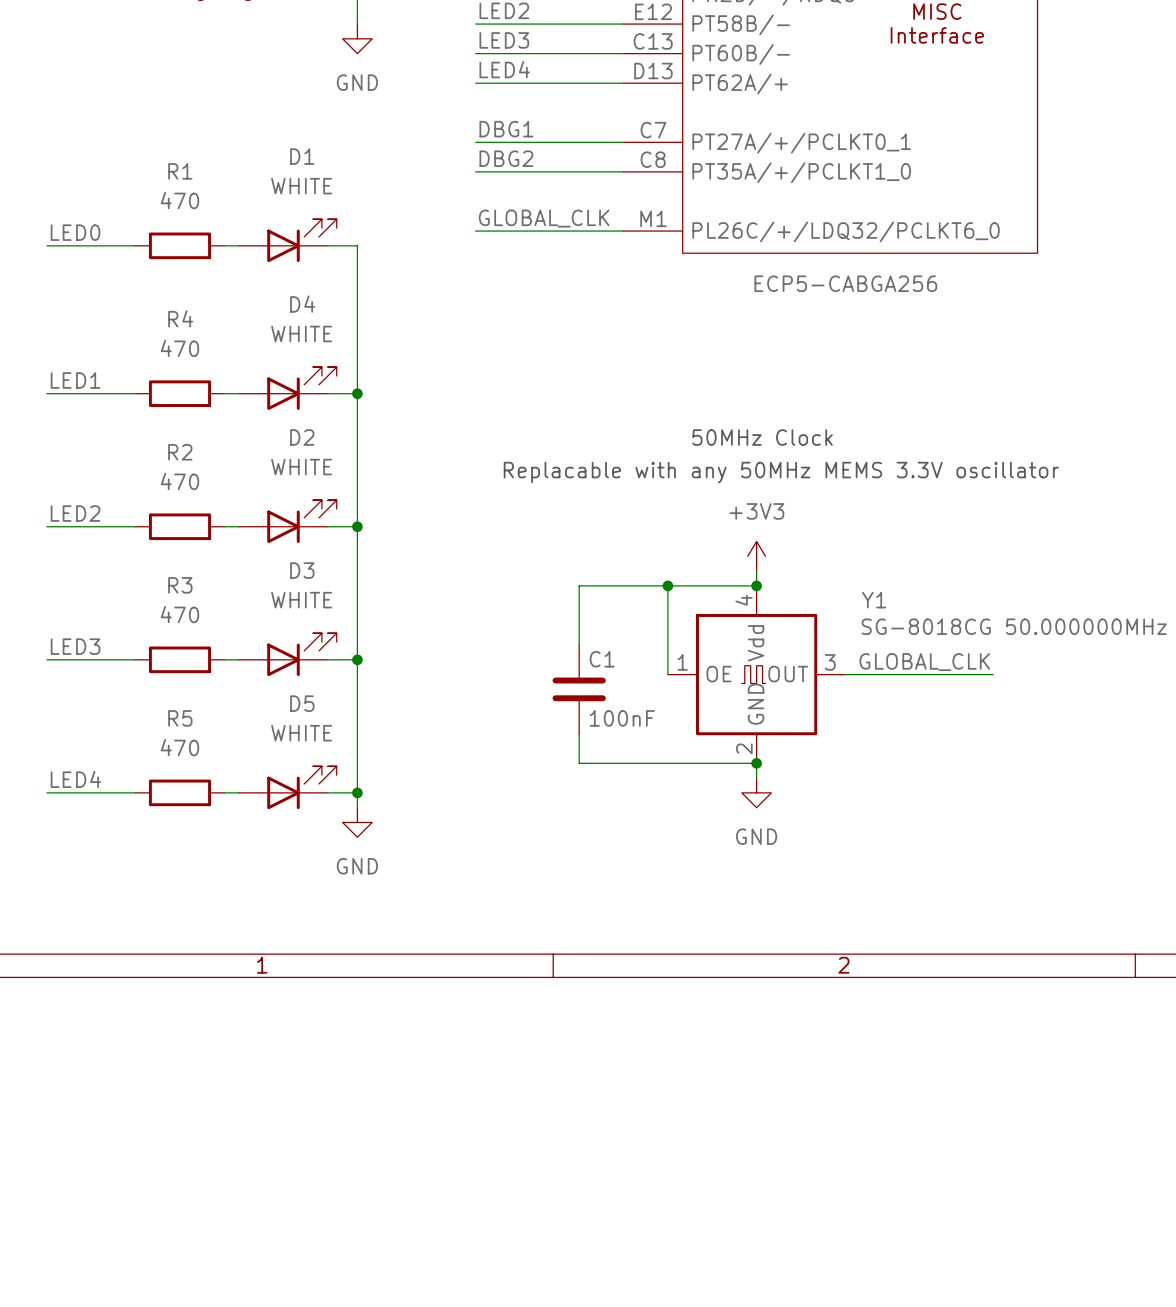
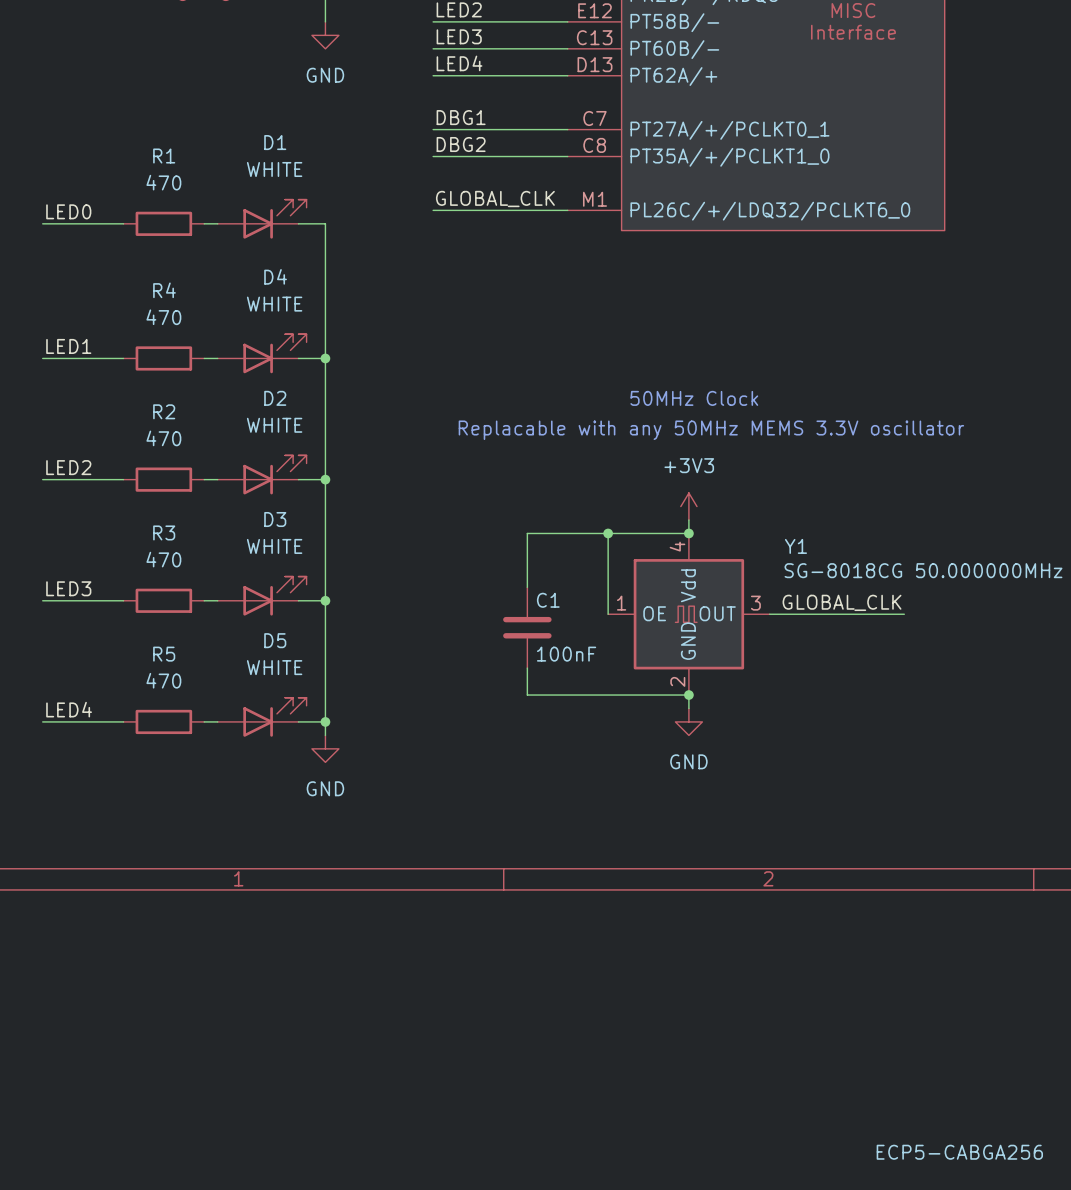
part value position: ECP5-CABGA256 (845, 283) -> ECP5-CABGA256 (959, 1152)

